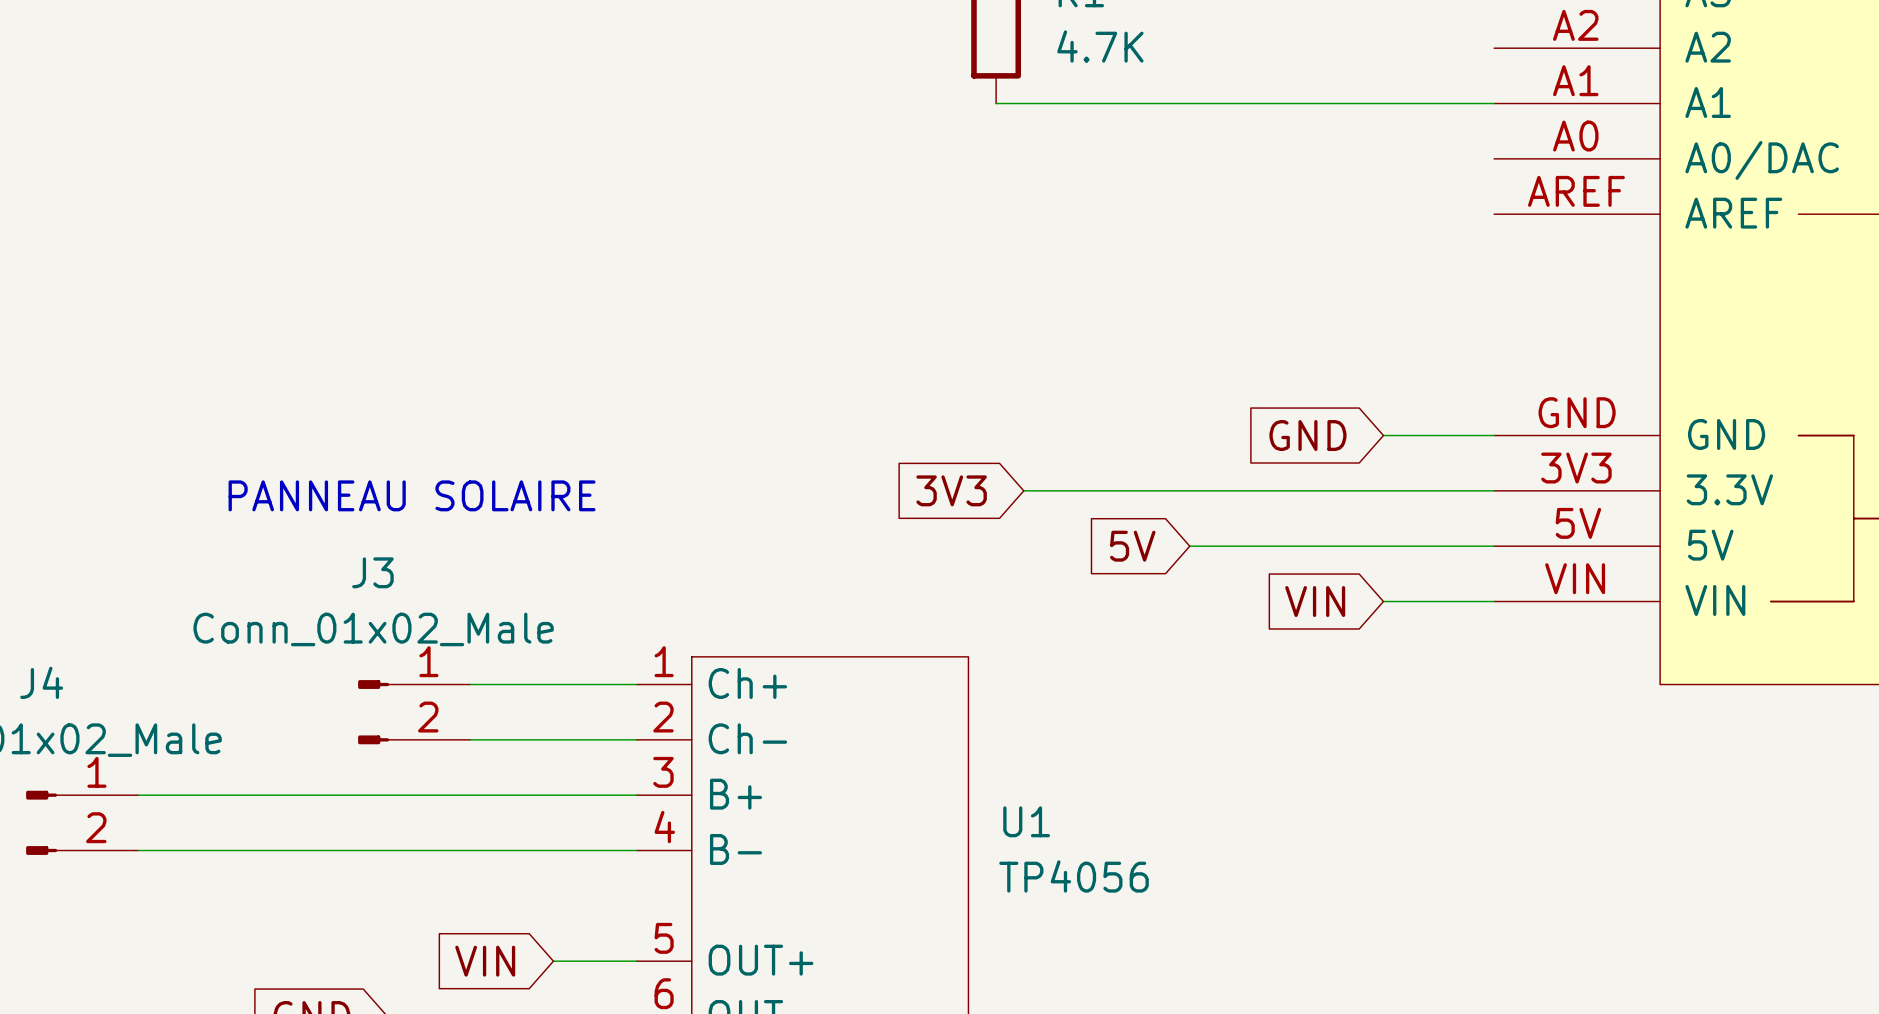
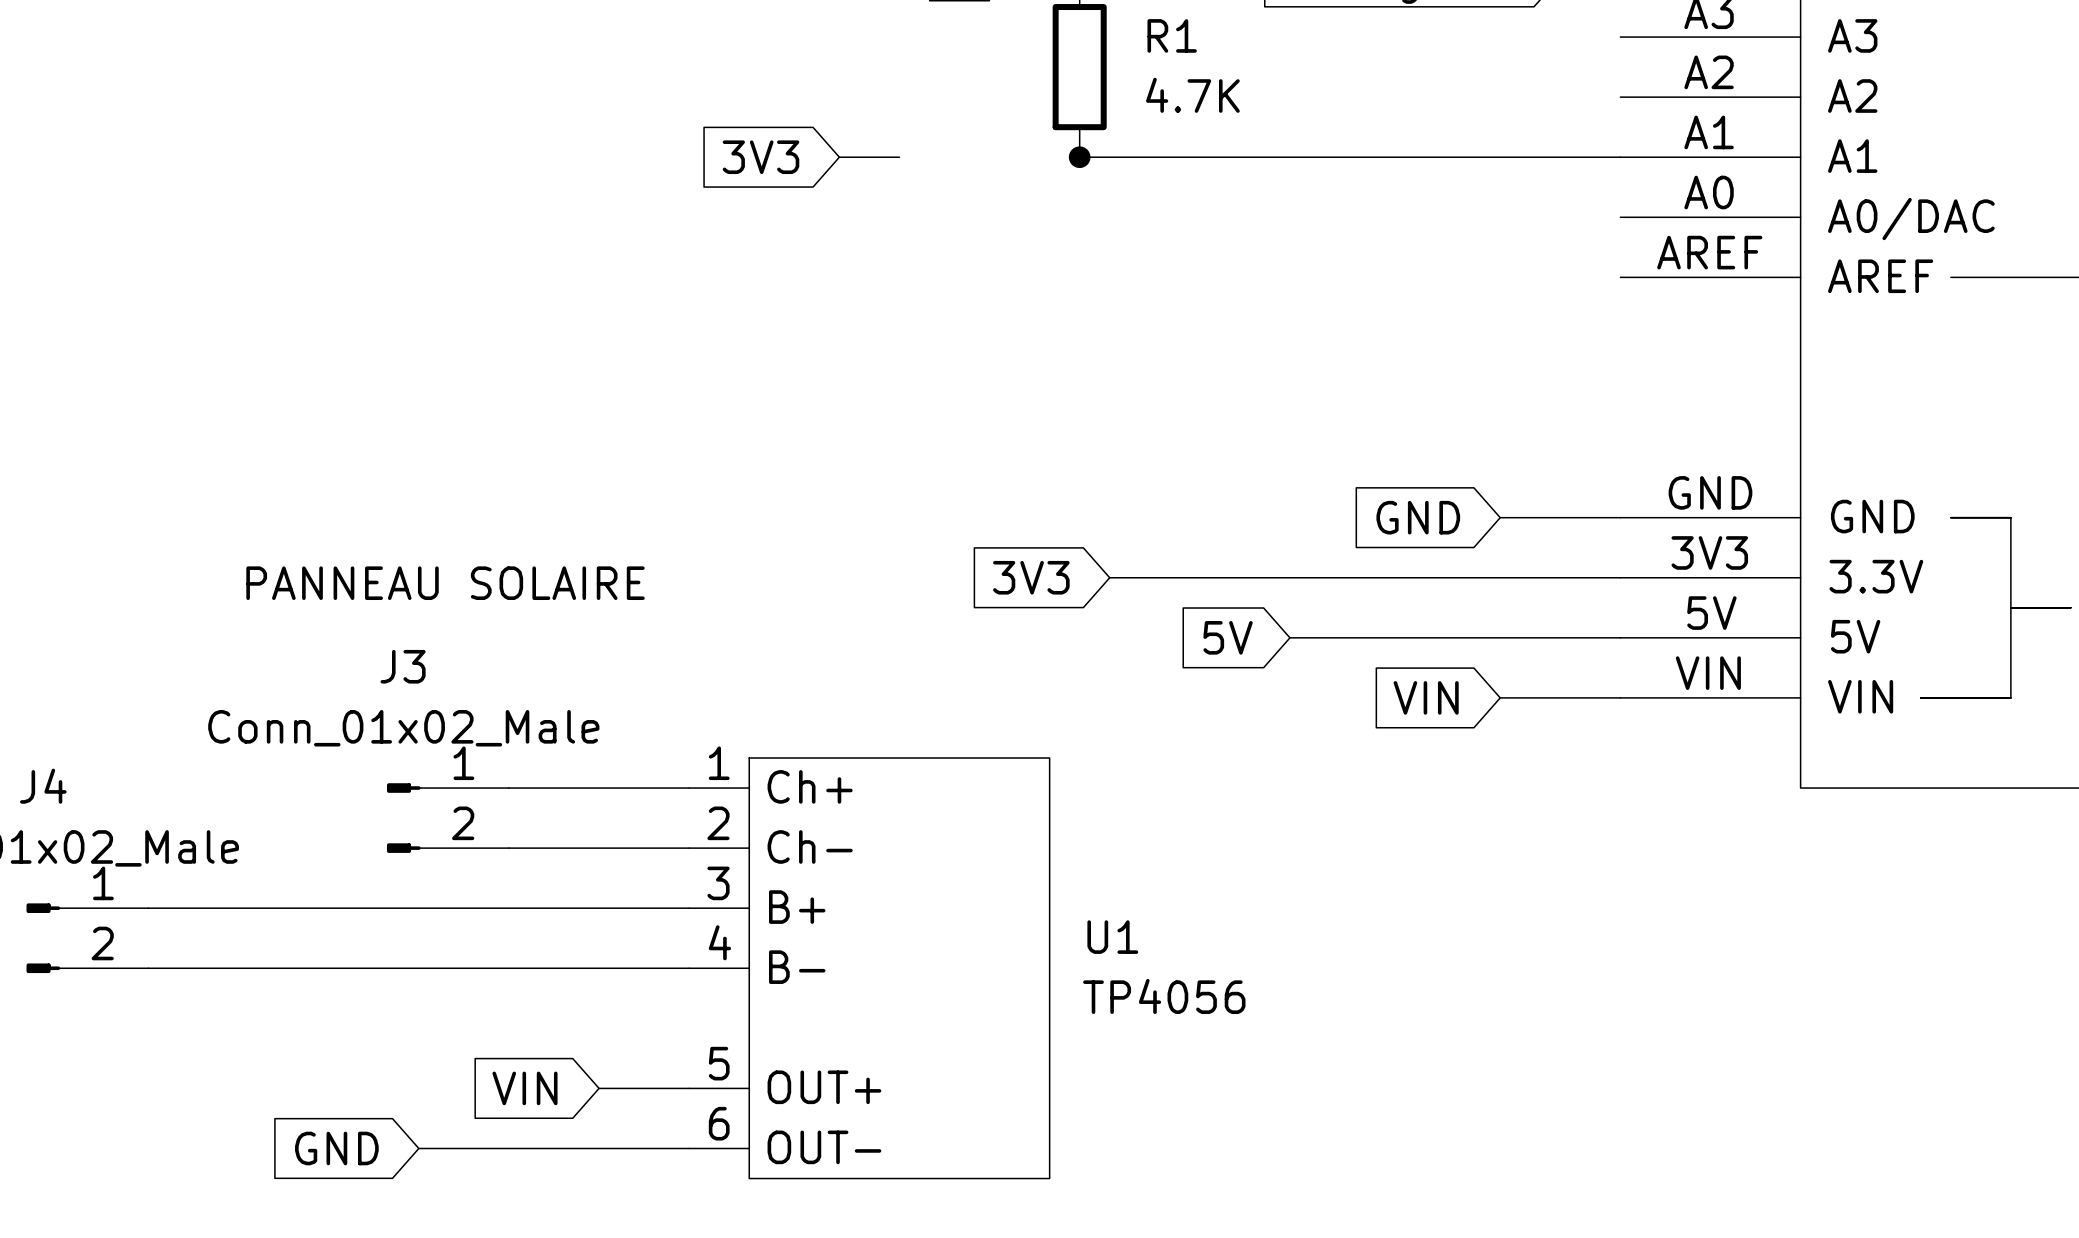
global label: none -> 3V3 (761, 157)
wire: none -> (839, 157) (899, 157)
junction: none -> (1079, 157)

